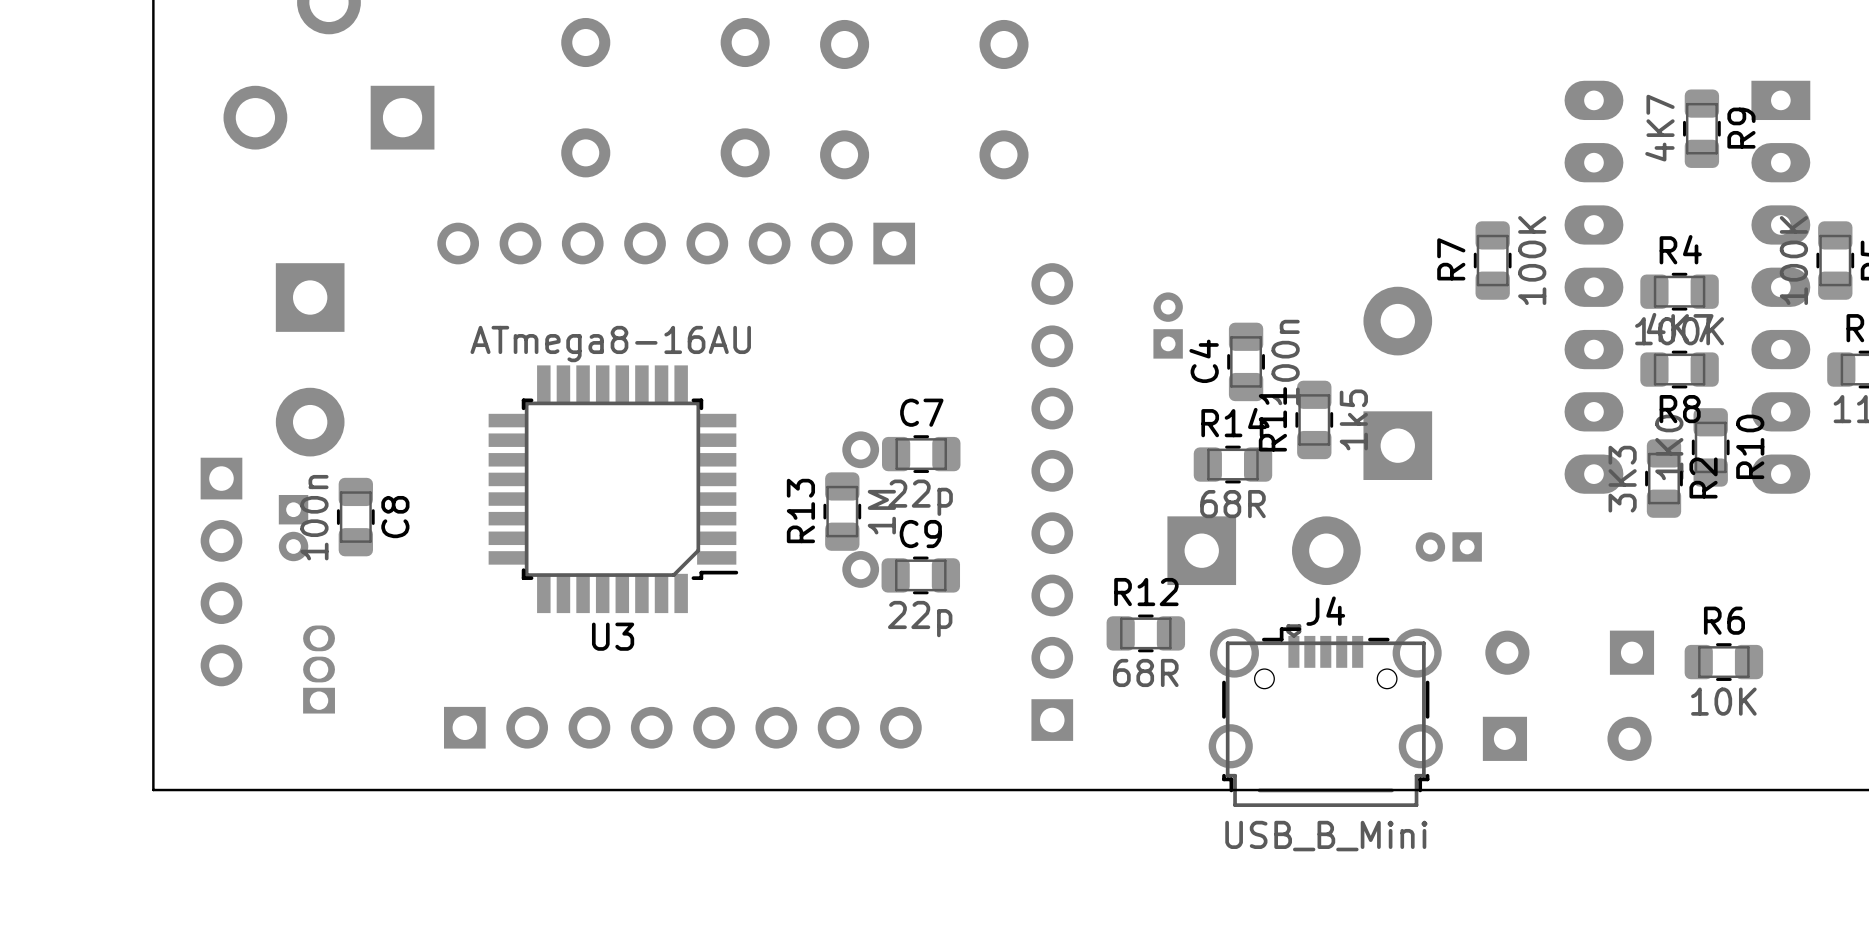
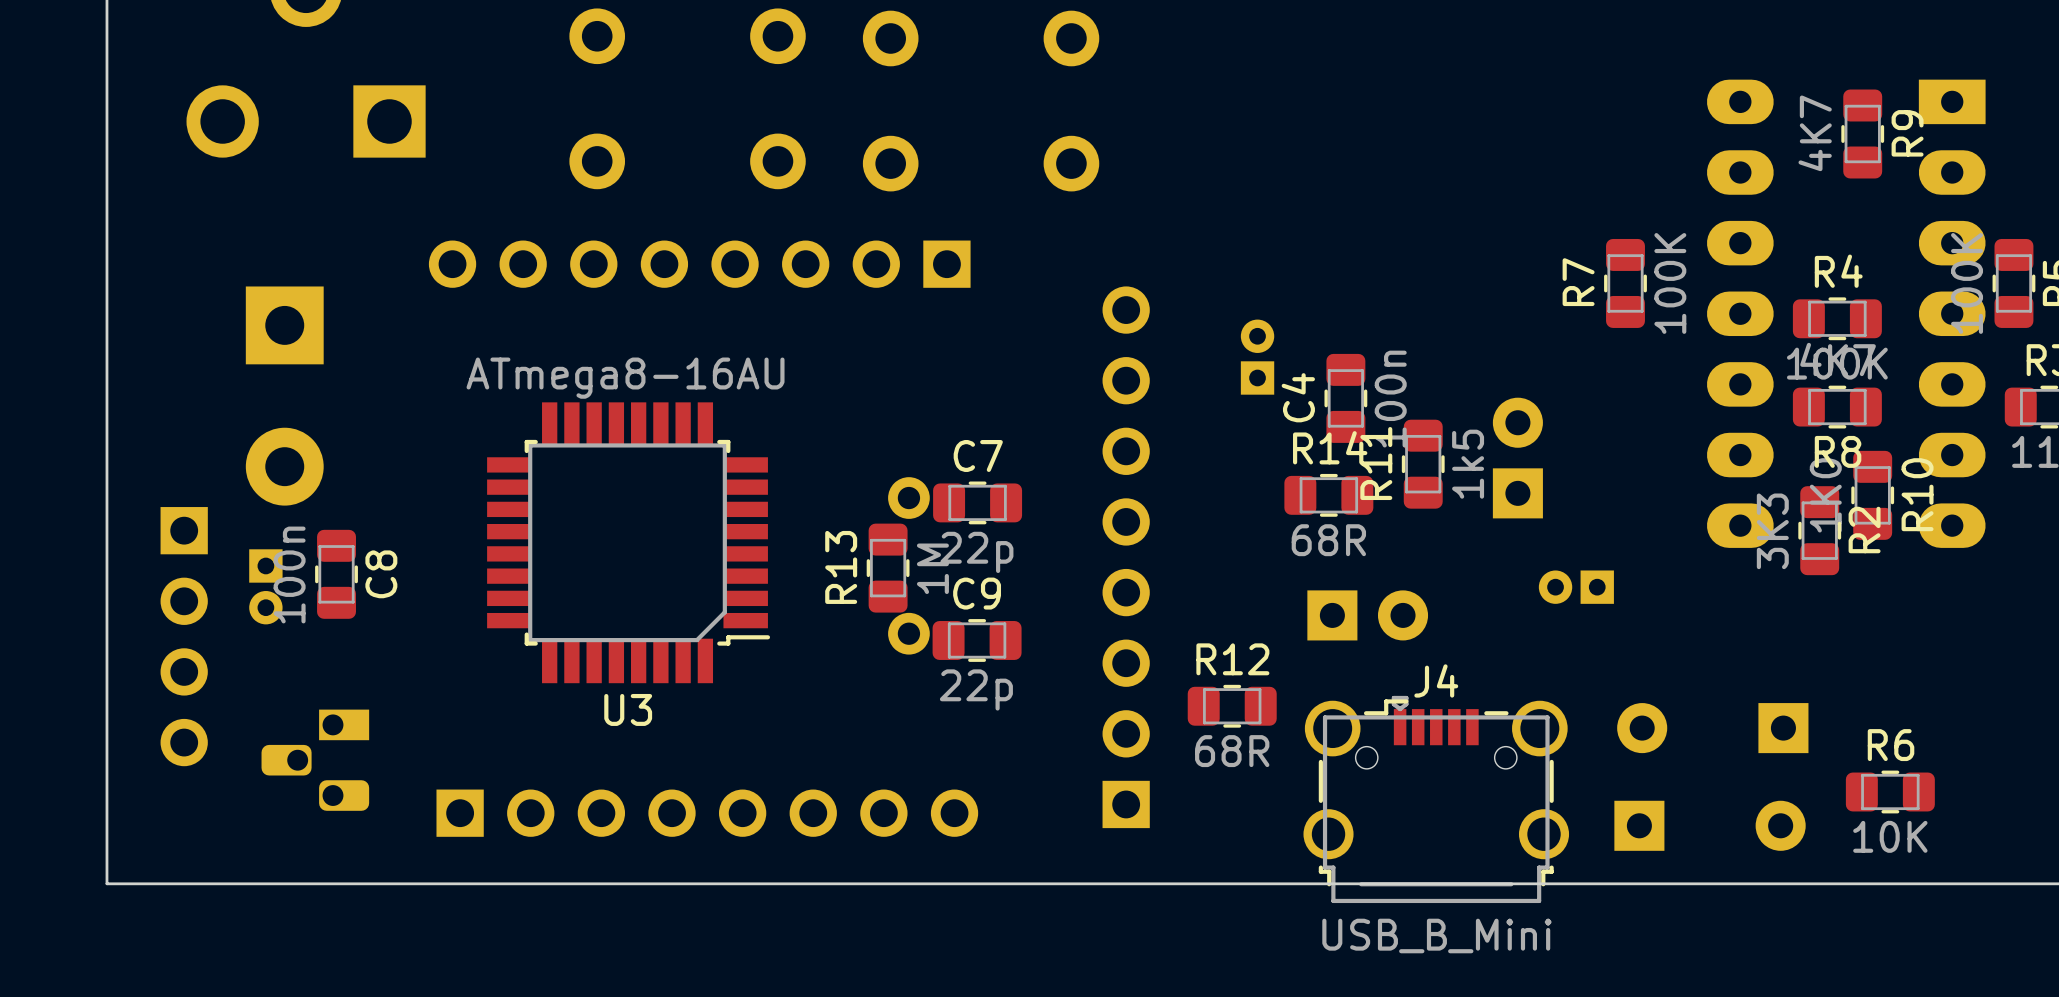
part: (1397, 383) -> none
part: none -> (1517, 458)
R14 position: (1232, 464) -> (1328, 495)
part footprint: [1167, 516, 1361, 586] -> [1307, 590, 1429, 641]
part position: (1448, 546) -> (1576, 587)
part footprint: [303, 625, 335, 714] -> [261, 709, 370, 811]
R6 position: (1723, 662) -> (1890, 791)

